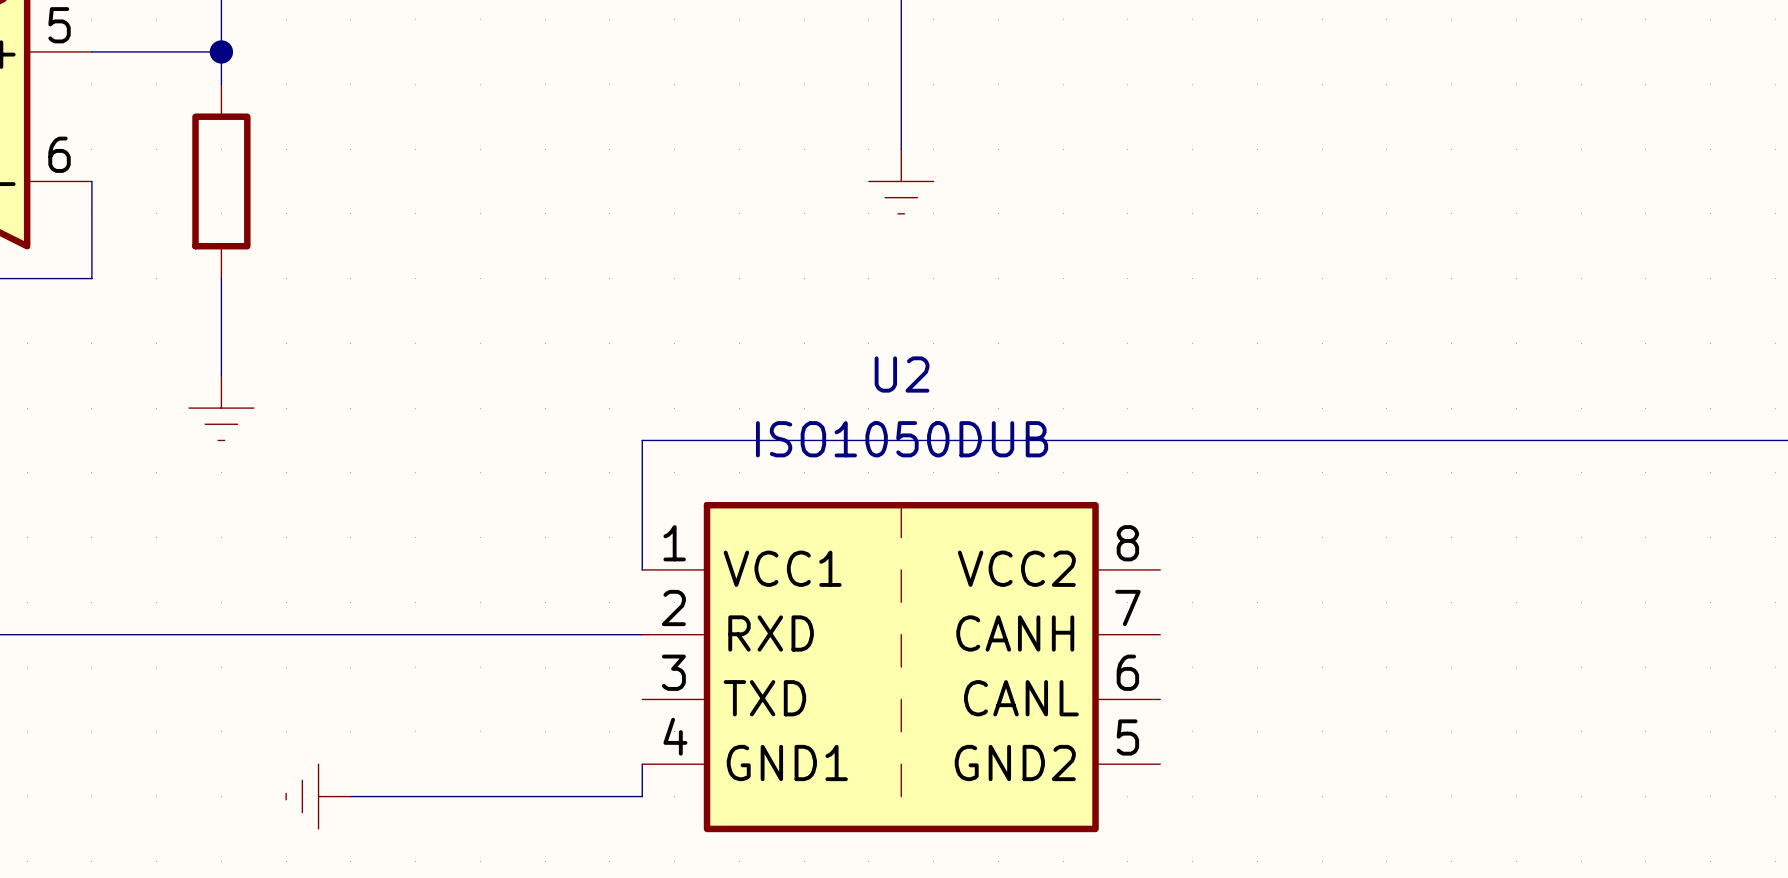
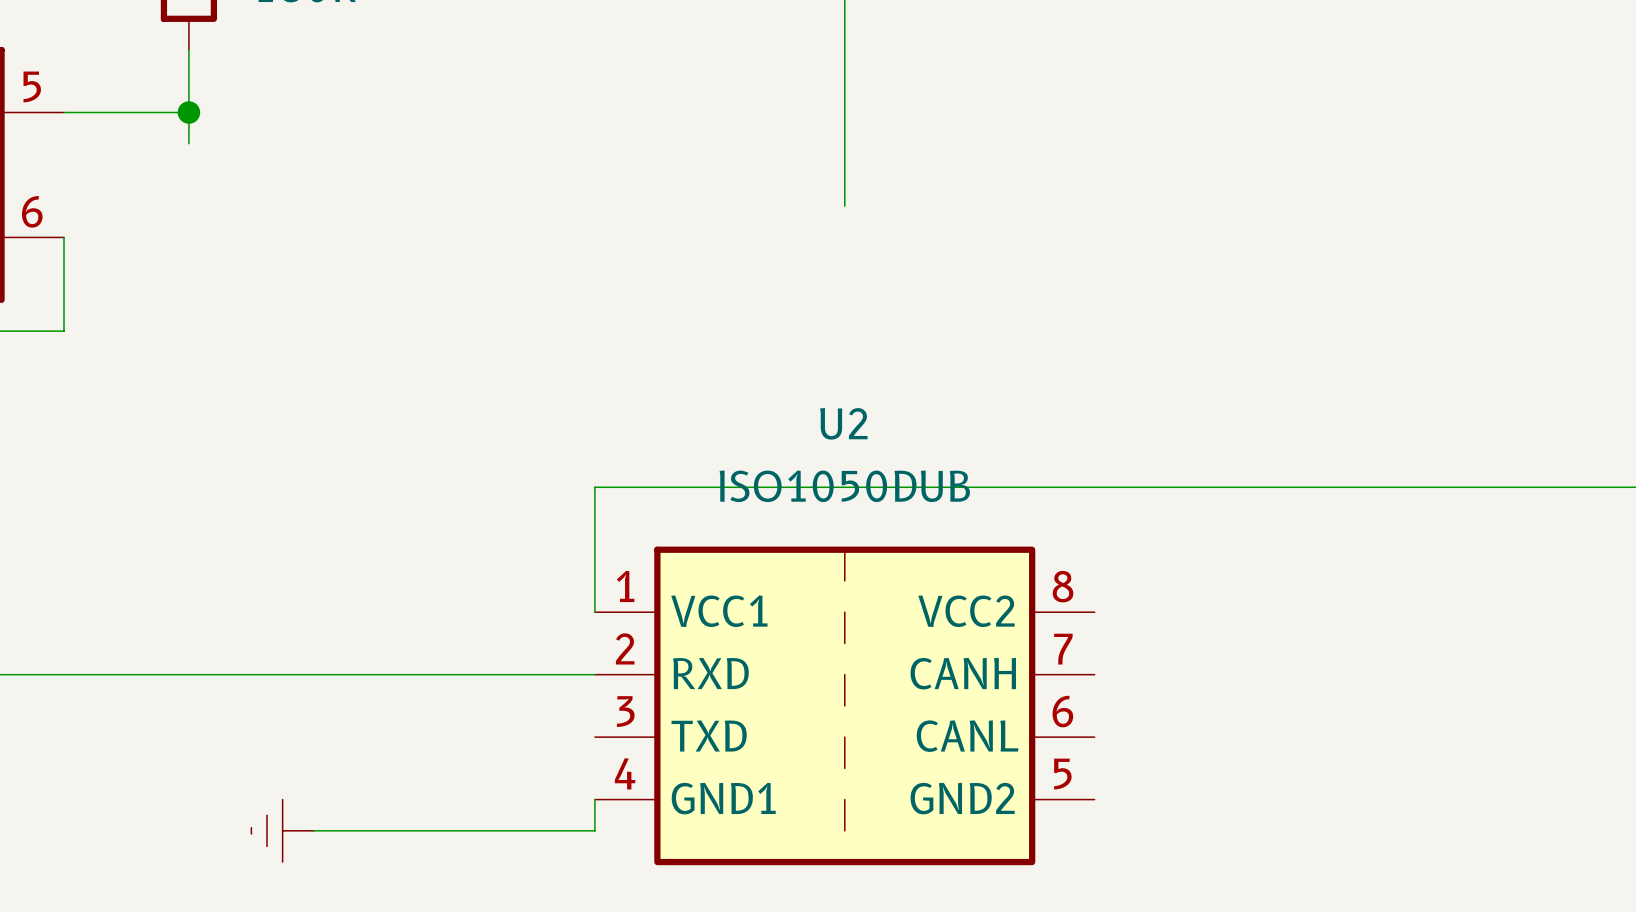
part: (221, 181) -> none
power symbol: (901, 181) -> none
wire: (221, 278) (221, 375) -> none
power symbol: (221, 408) -> none

